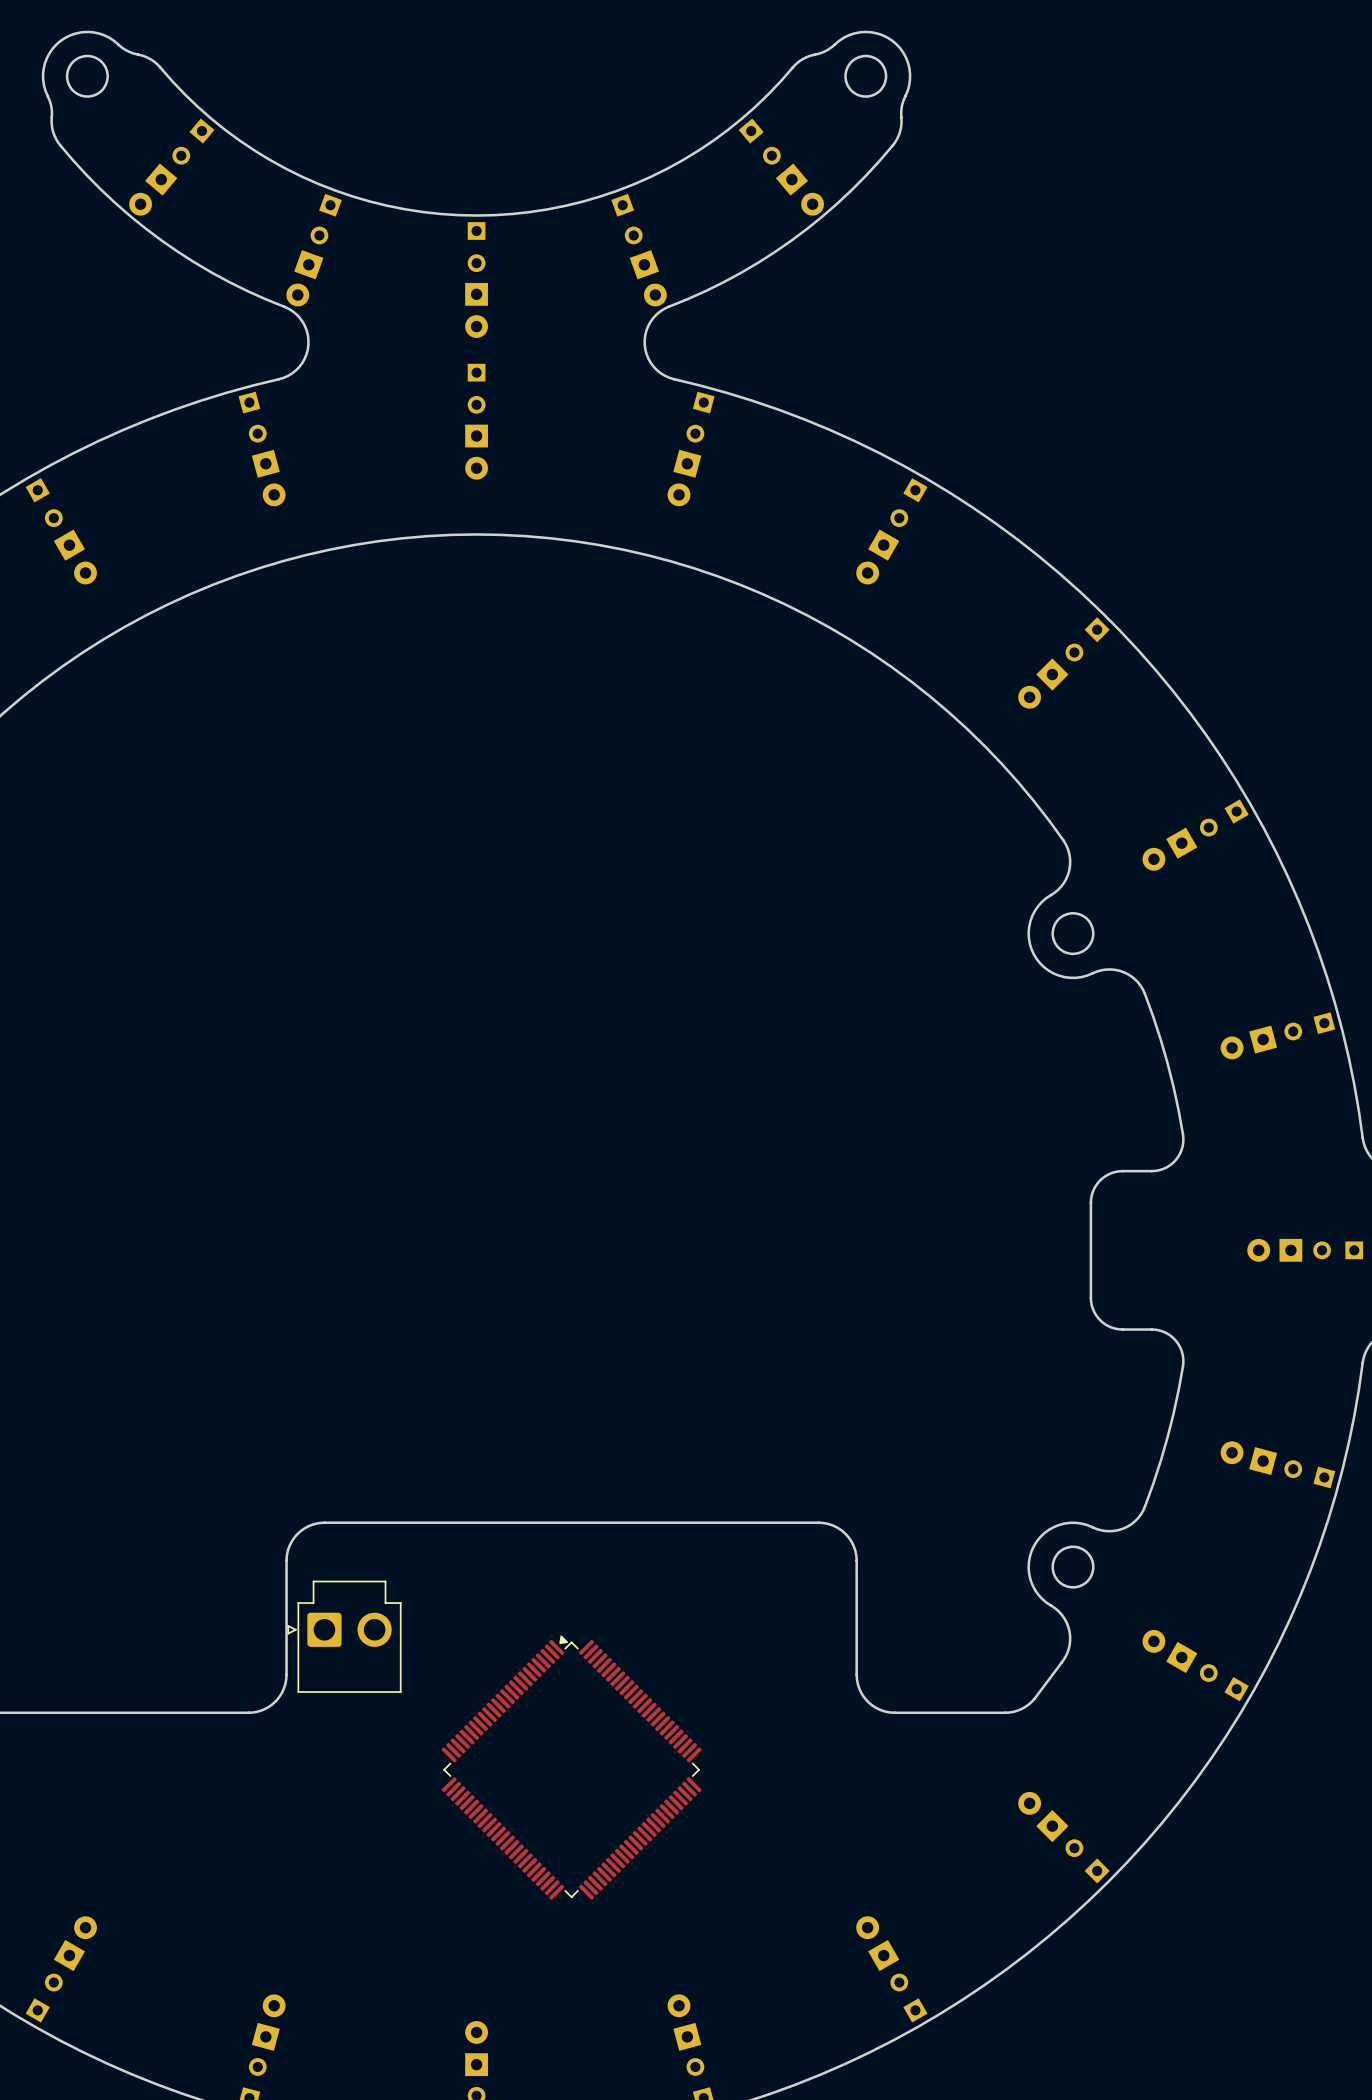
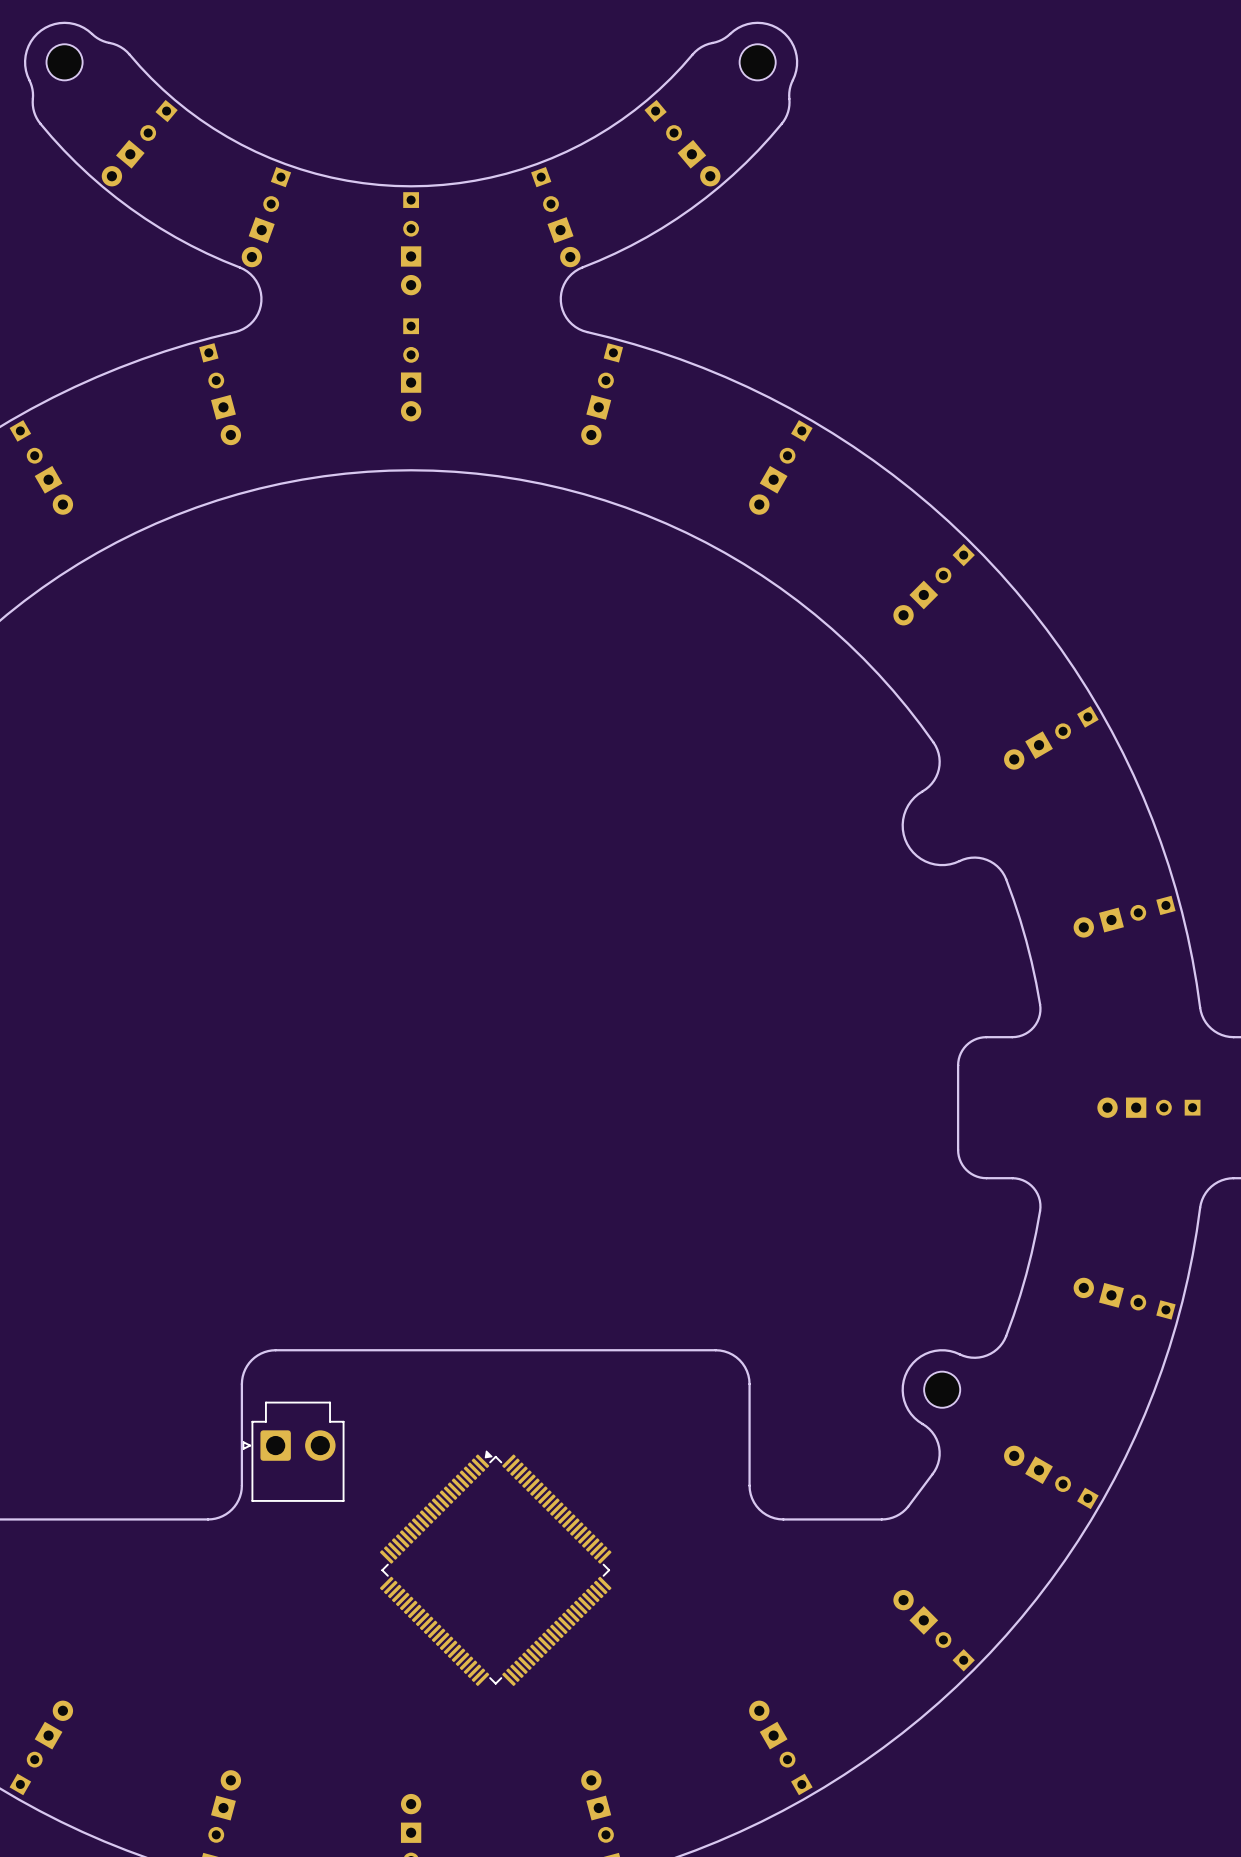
round board edge: [65, 54, 109, 98] -> none
round board edge: [844, 54, 888, 98] -> none
part: none -> (64, 62)
part: none -> (757, 62)
round board edge: [1051, 912, 1095, 956] -> none
round board edge: [1051, 1545, 1095, 1589] -> none
part: none -> (942, 1389)

